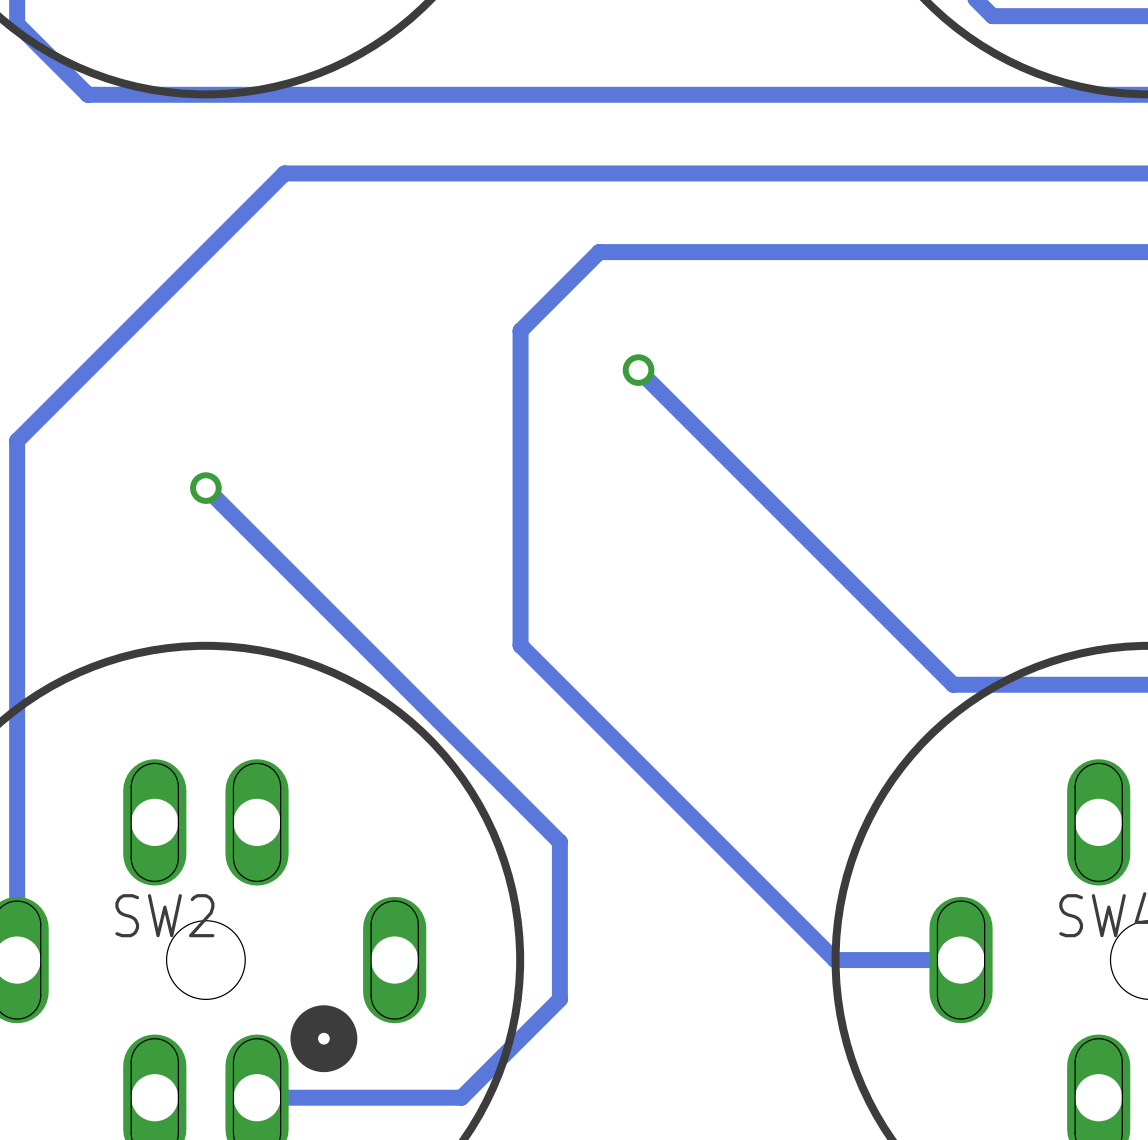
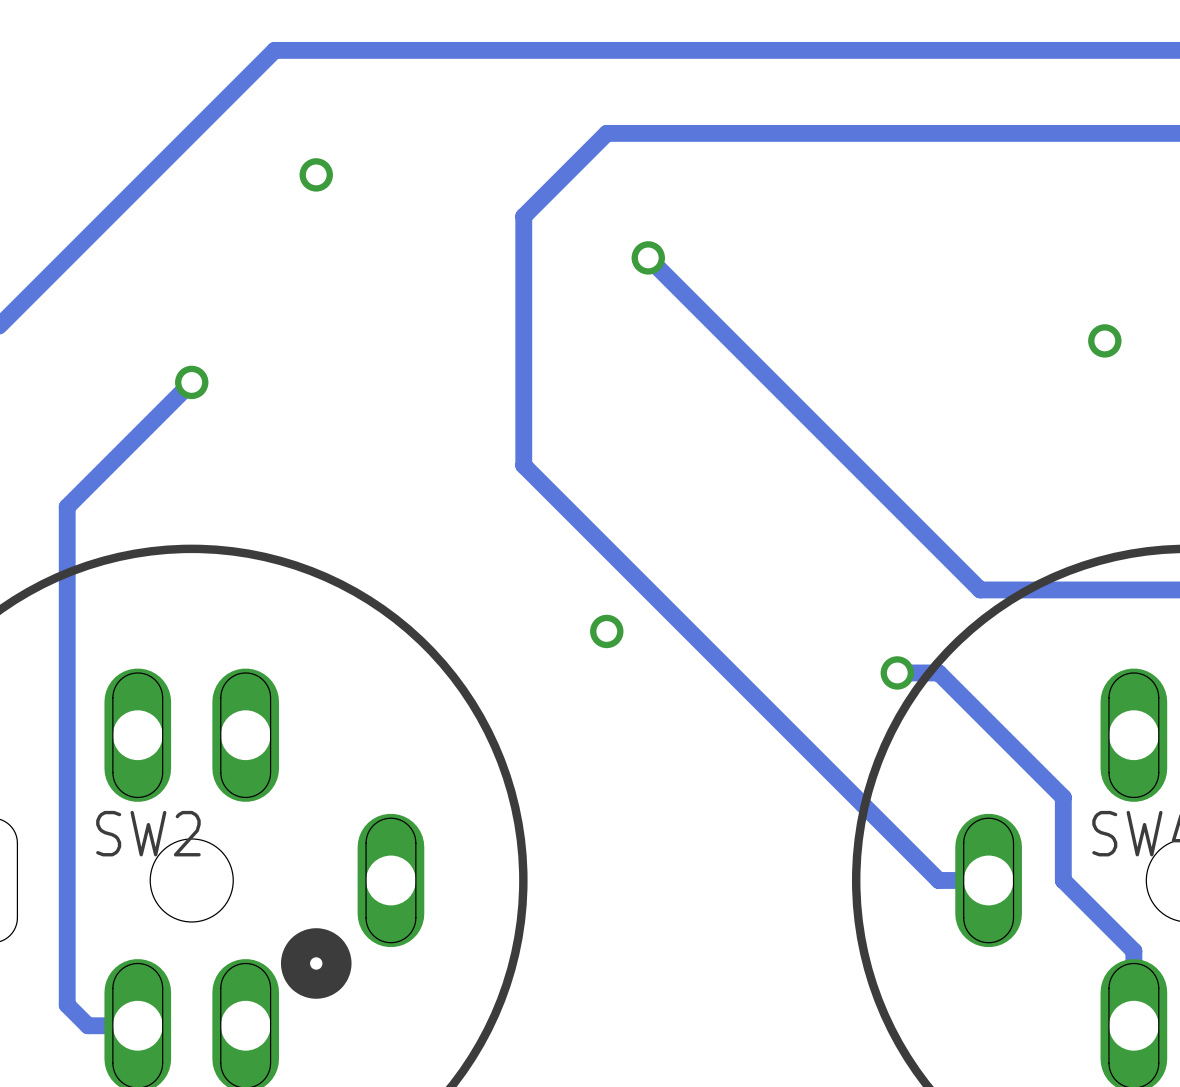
via: none -> (316, 174)
via: none -> (1104, 340)
track: (205, 488) (559, 842) (559, 999) (461, 1097) (257, 1097) -> (191, 382) (67, 506) (67, 1004) (87, 1025) (137, 1025)
track: (520, 566) (520, 645) (835, 960) (913, 960) -> (523, 465) (938, 880)
via: none -> (606, 631)
track: none -> (897, 672) (938, 672) (1063, 797) (1063, 880) (1133, 951) (1133, 1025)
via: none -> (897, 672)

